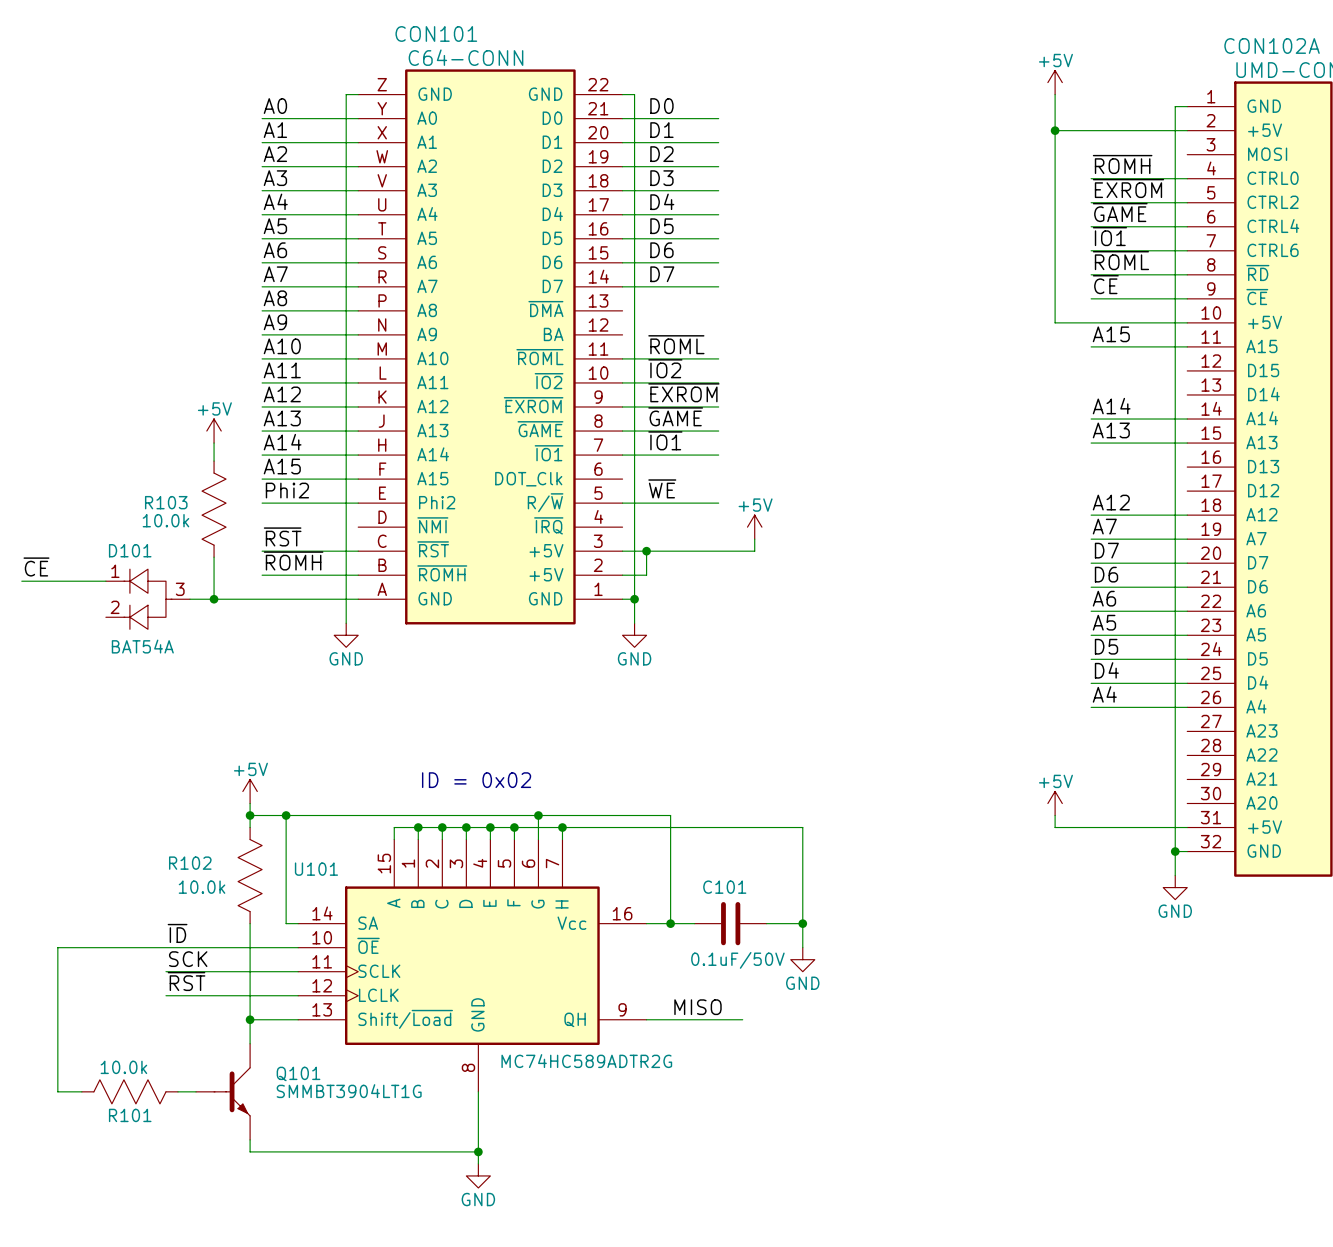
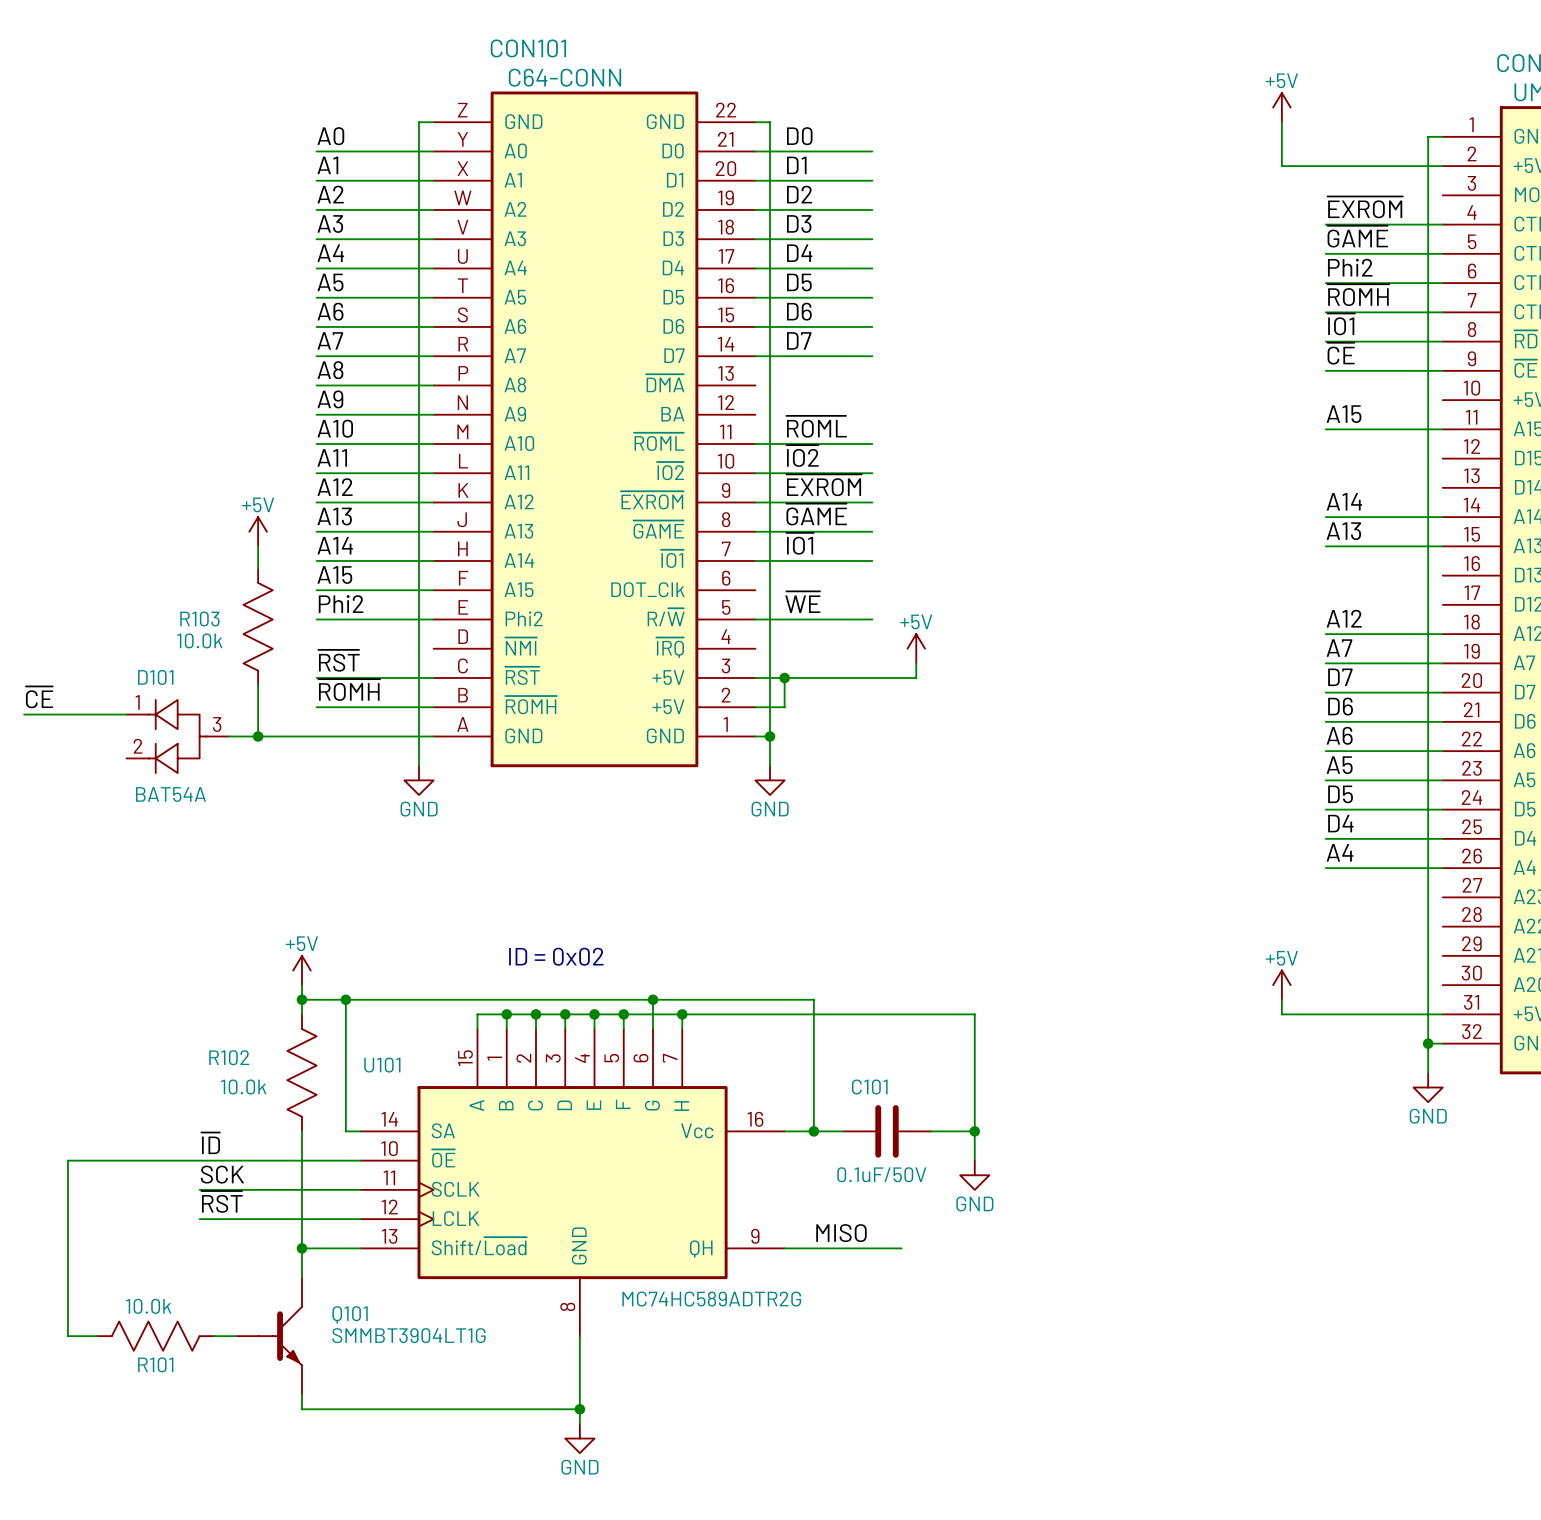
wire: (1055, 130) (1055, 322) (1187, 322) -> none
junction: (1055, 130) -> none
label: ~{ROMH} (1122, 164) -> ~{EXROM} (1365, 207)
label: ~{EXROM} (1128, 188) -> ~{GAME} (1357, 236)
label: ~{GAME} (1120, 212) -> Phi2 (1350, 267)
label: ~{IO1} (1109, 236) -> ~{ROMH} (1358, 295)
label: ~{ROML} (1120, 260) -> ~{IO1} (1341, 324)

